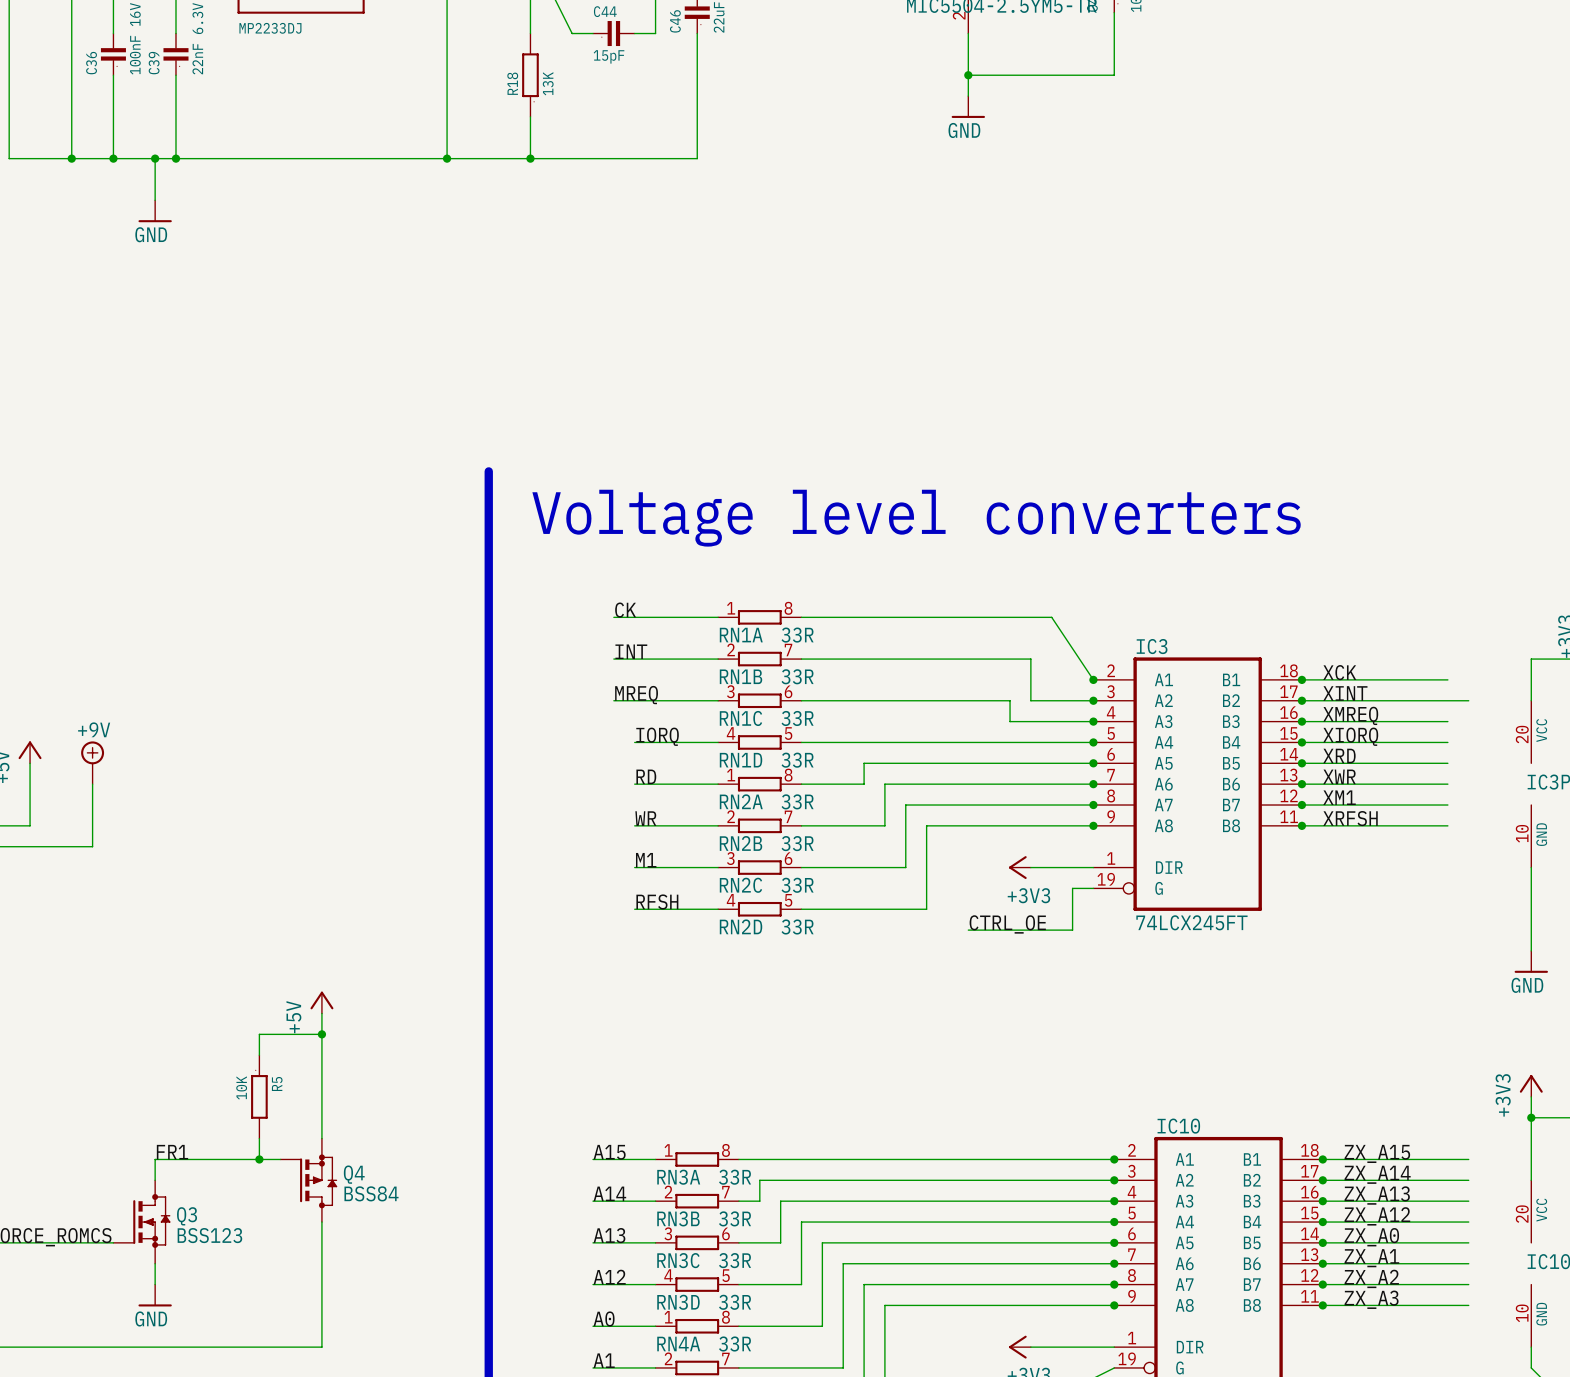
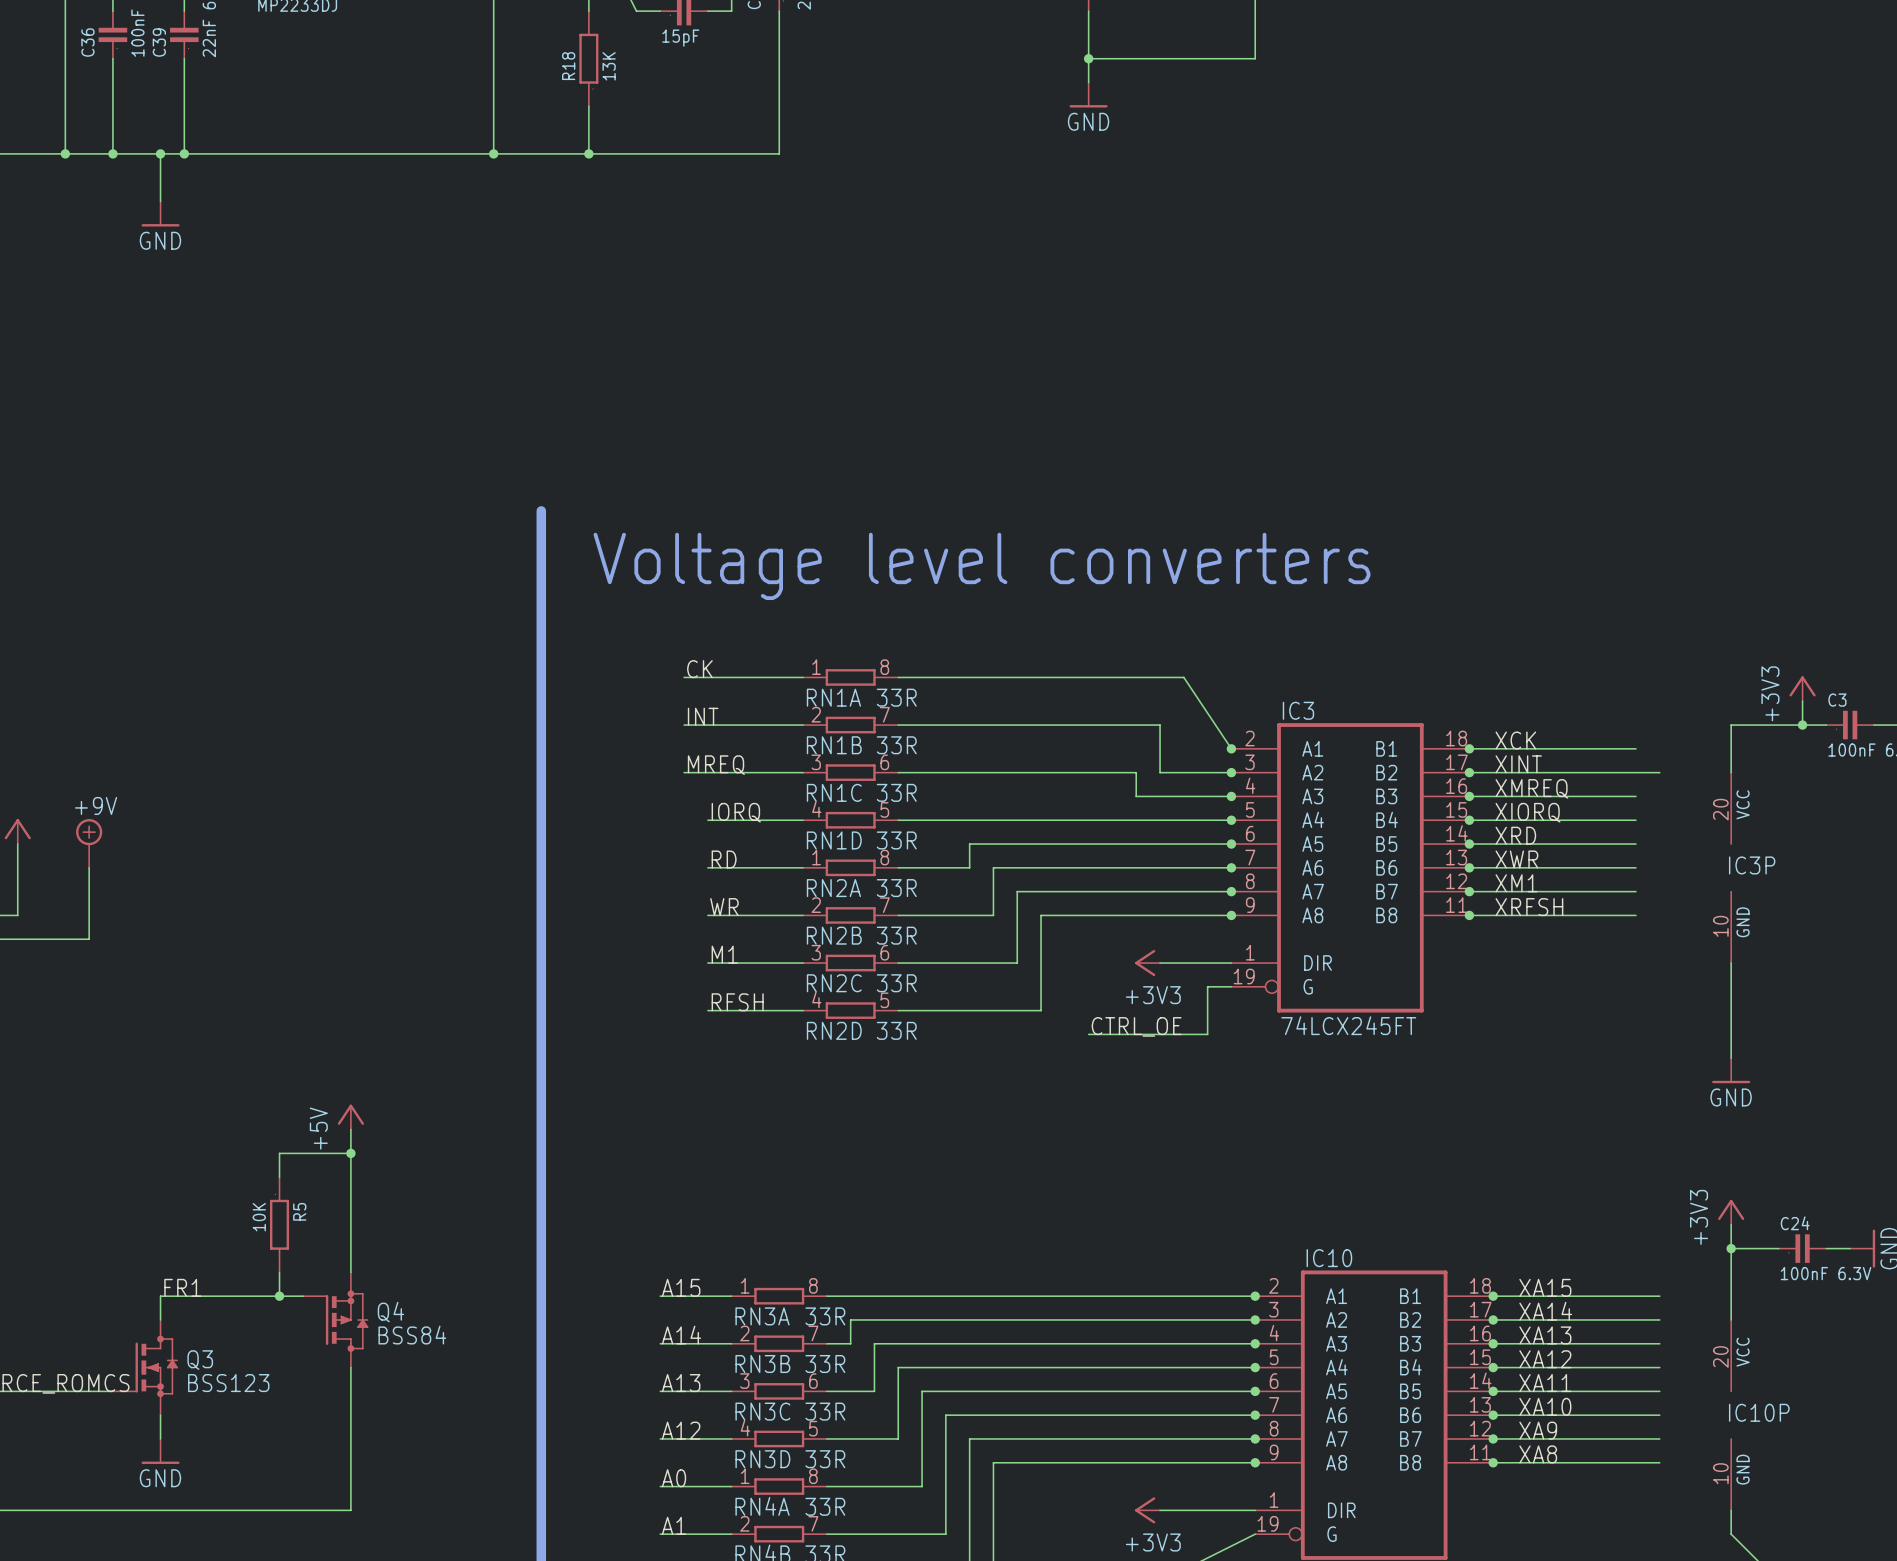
label: ZX_A15 (1377, 1153) -> XA15 (1545, 1287)
label: ZX_A14 (1377, 1174) -> XA14 (1545, 1311)
label: ZX_A13 (1377, 1195) -> XA13 (1545, 1335)
label: ZX_A12 (1377, 1216) -> XA12 (1545, 1359)
label: ZX_A0 (1371, 1237) -> XA11 (1545, 1383)
label: ZX_A1 (1371, 1258) -> XA10 (1545, 1406)
label: ZX_A2 (1371, 1278) -> XA9 (1538, 1430)
label: ZX_A3 (1371, 1299) -> XA8 (1538, 1454)

